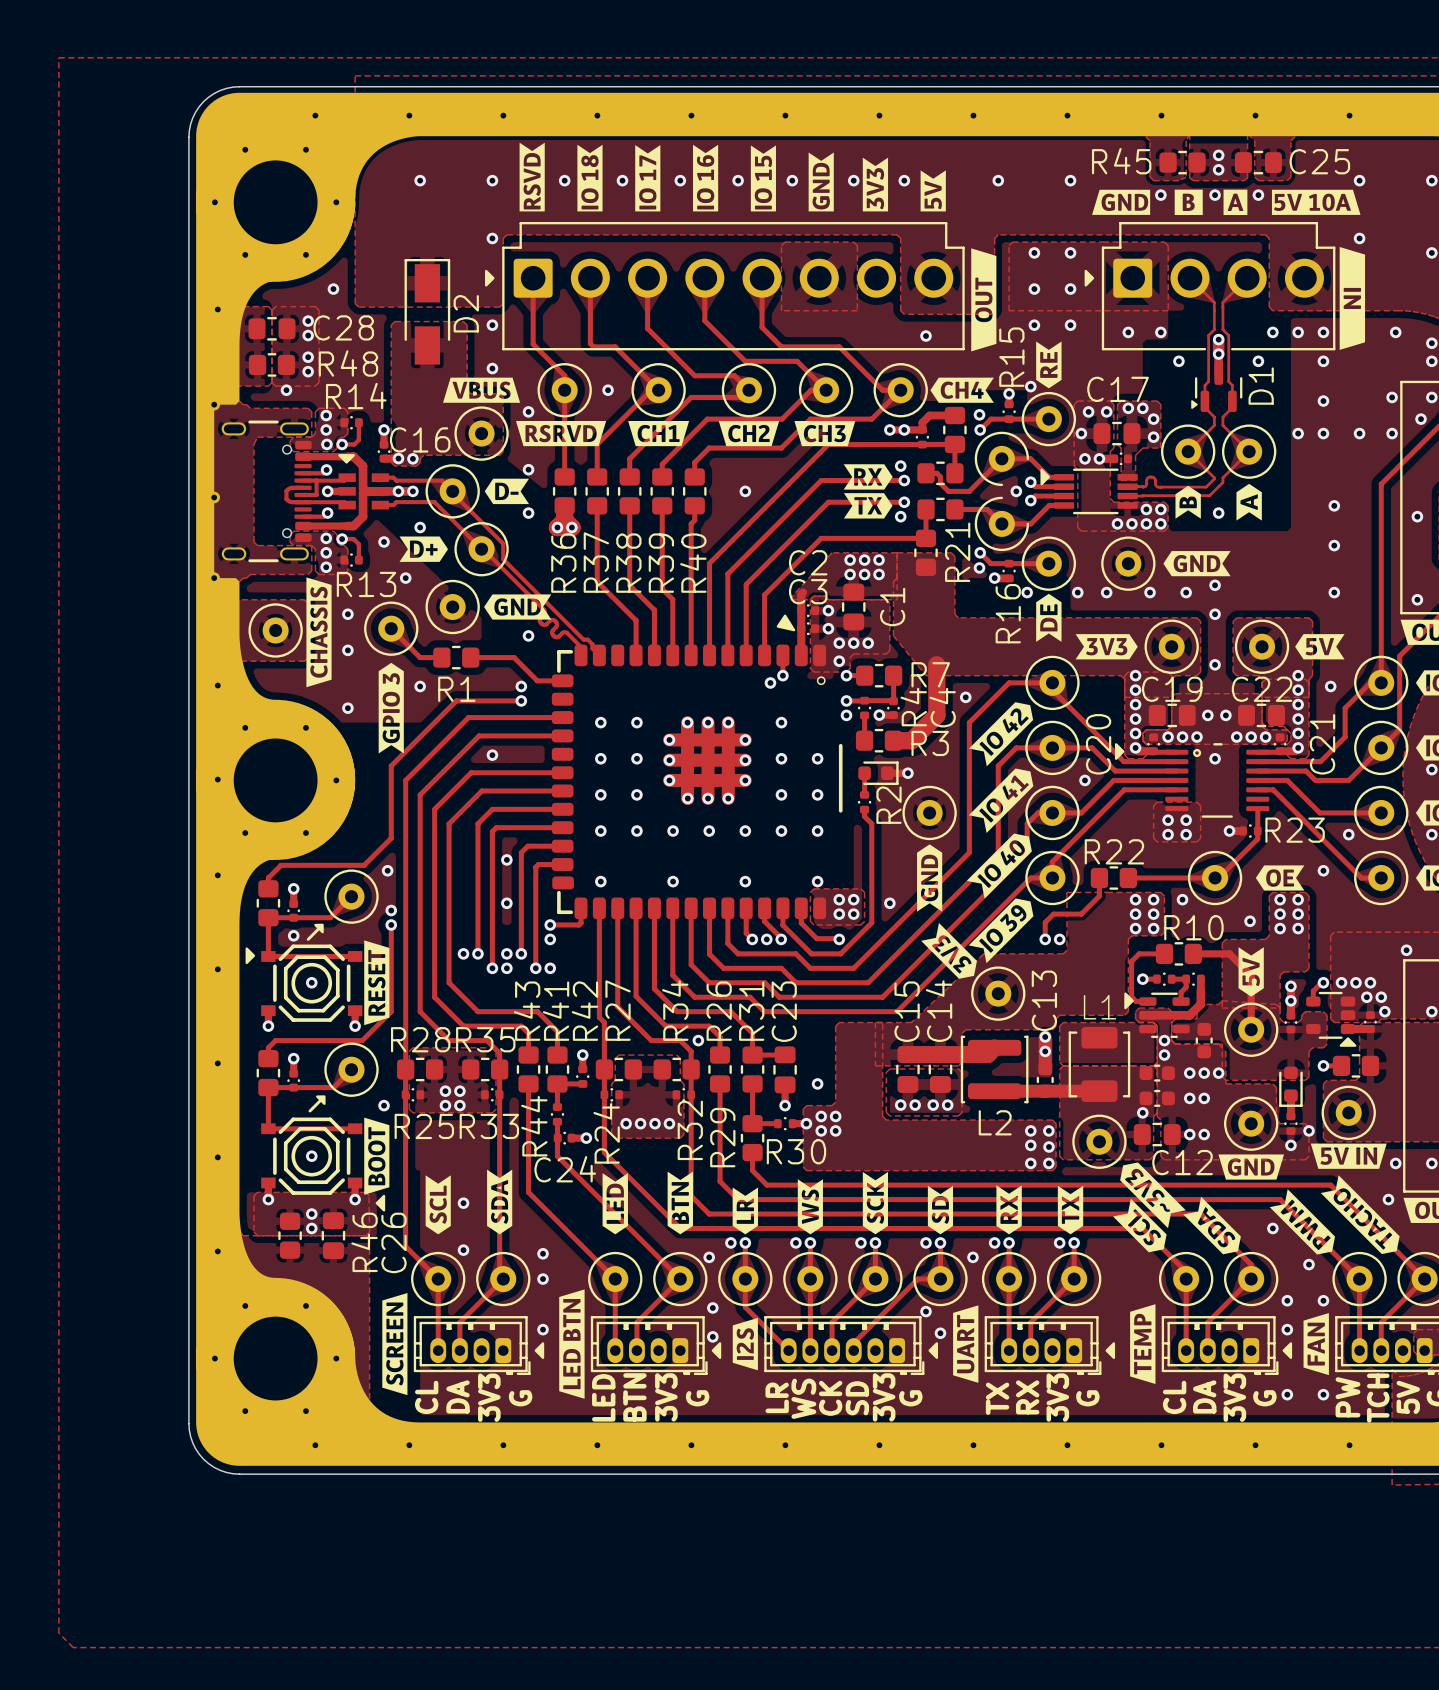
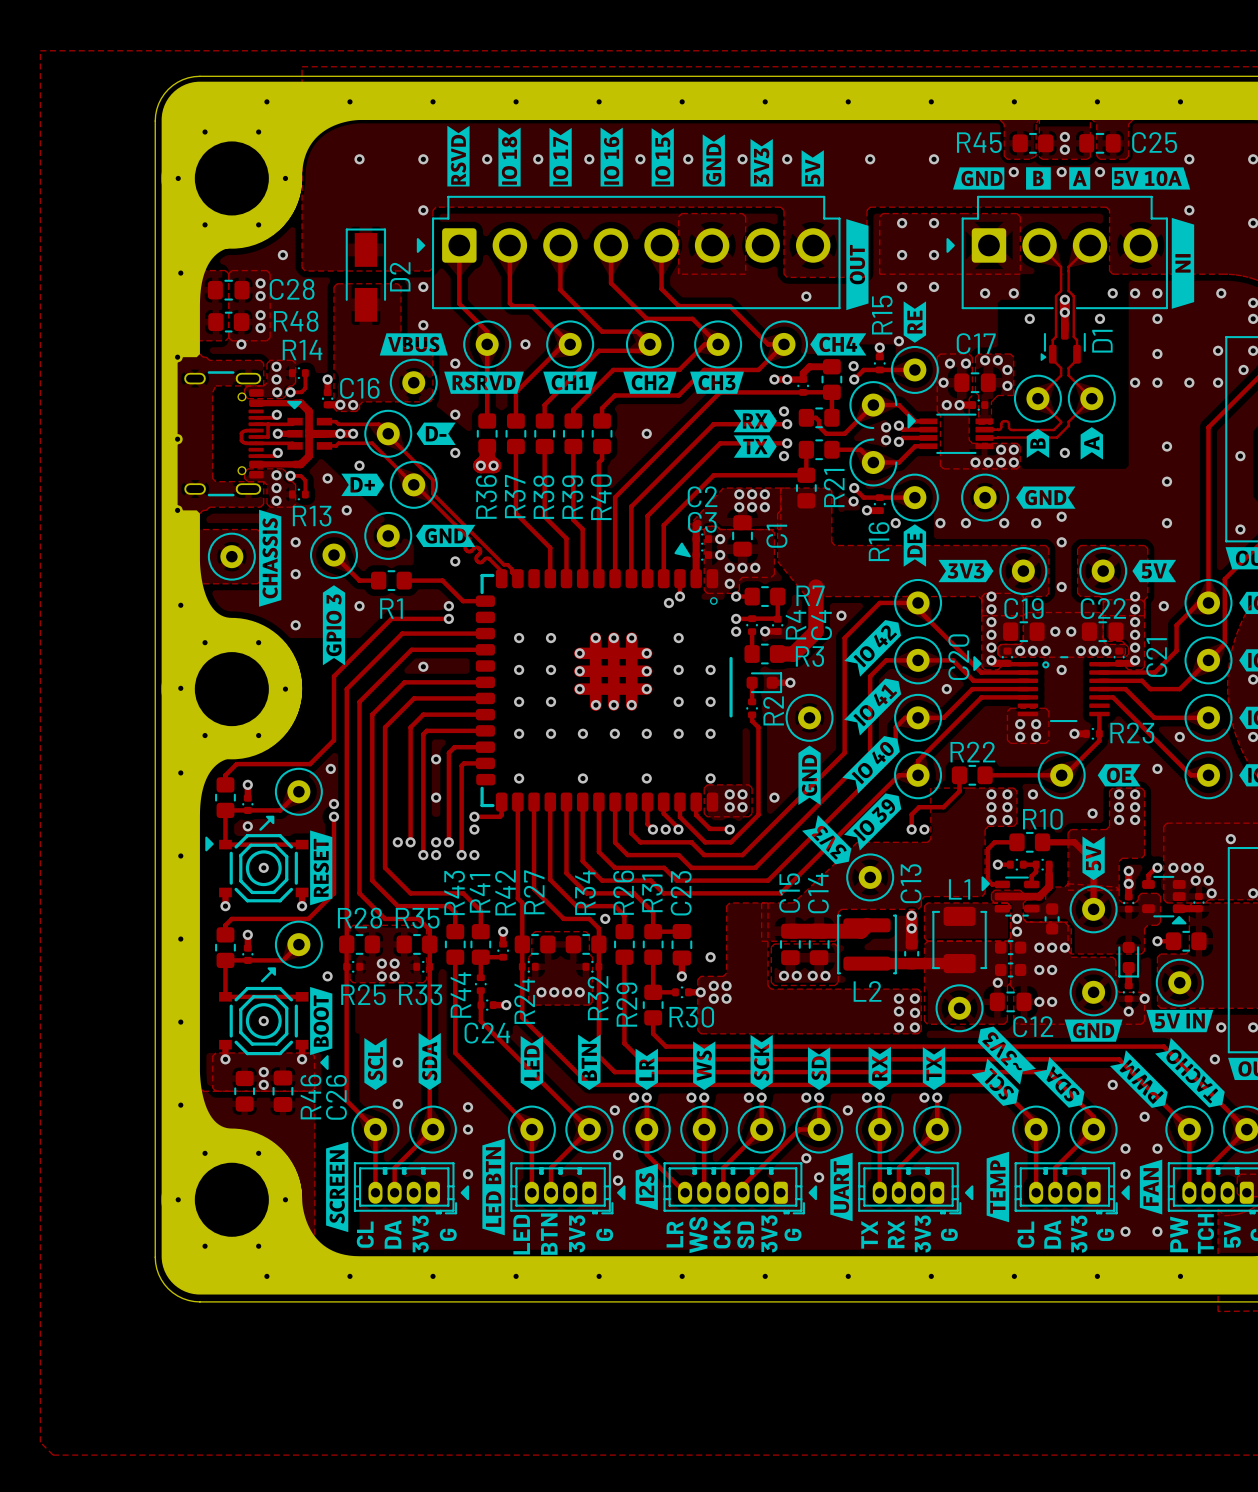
via: none -> (886, 427)
via: (1016, 491) -> none
via: none -> (886, 440)

